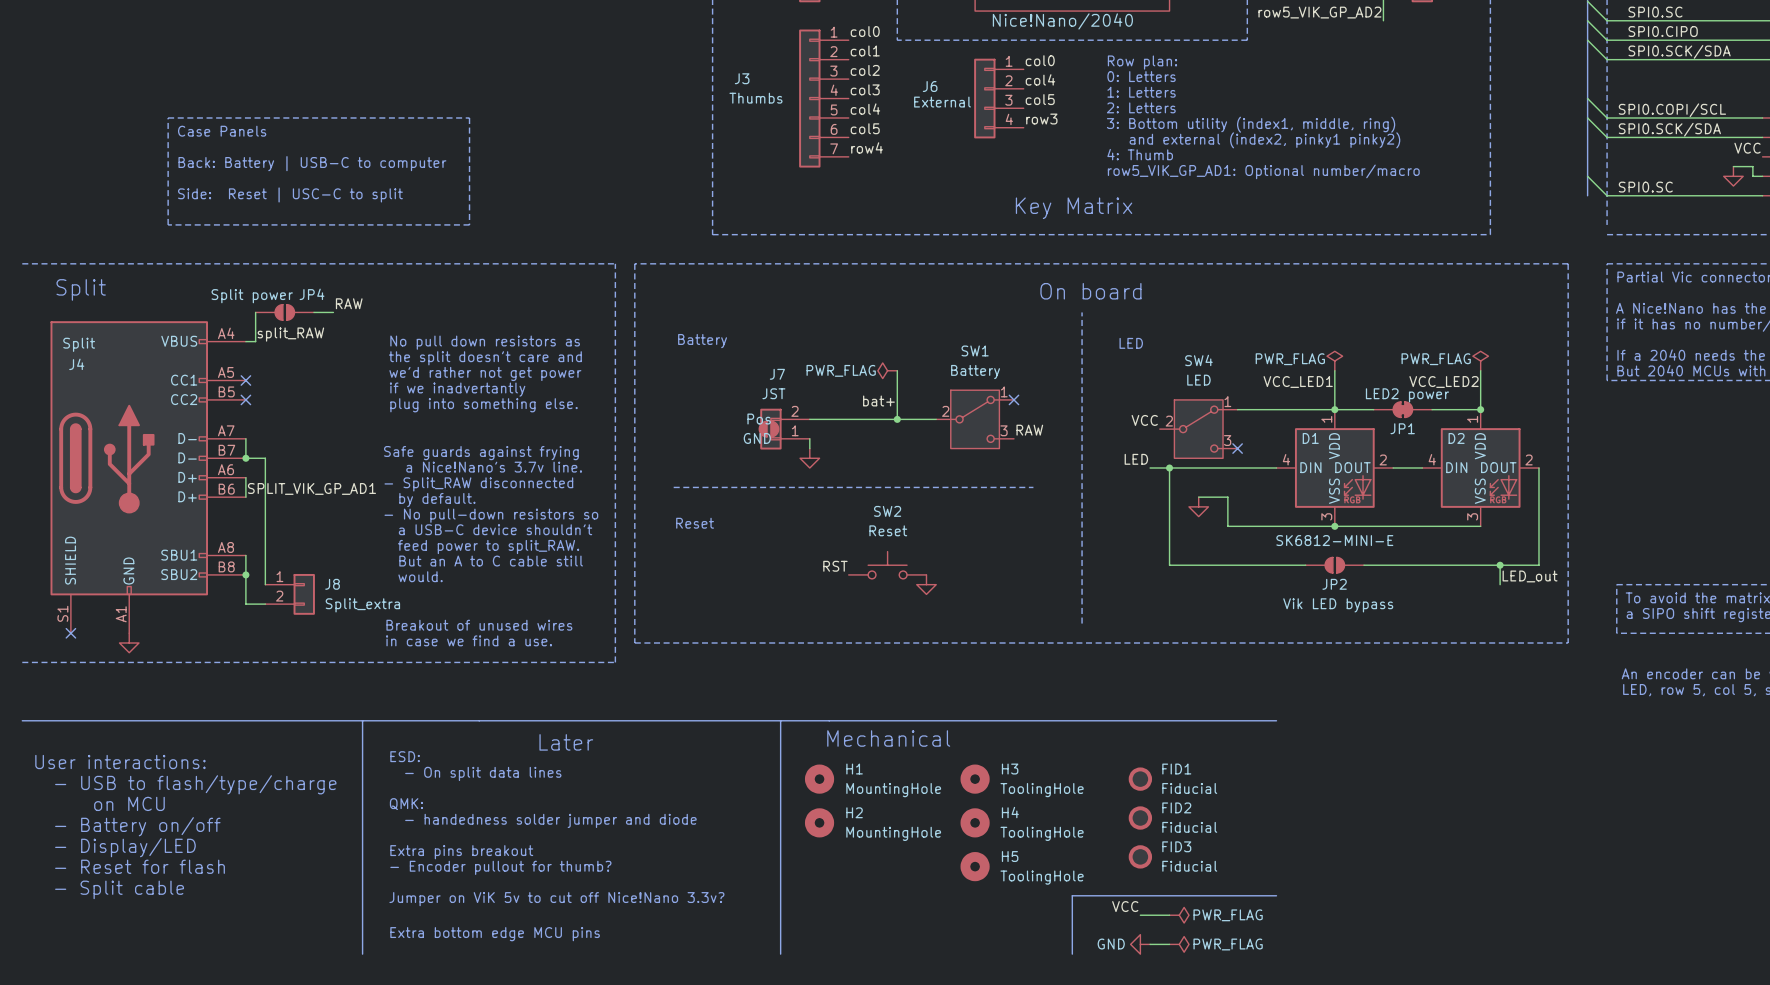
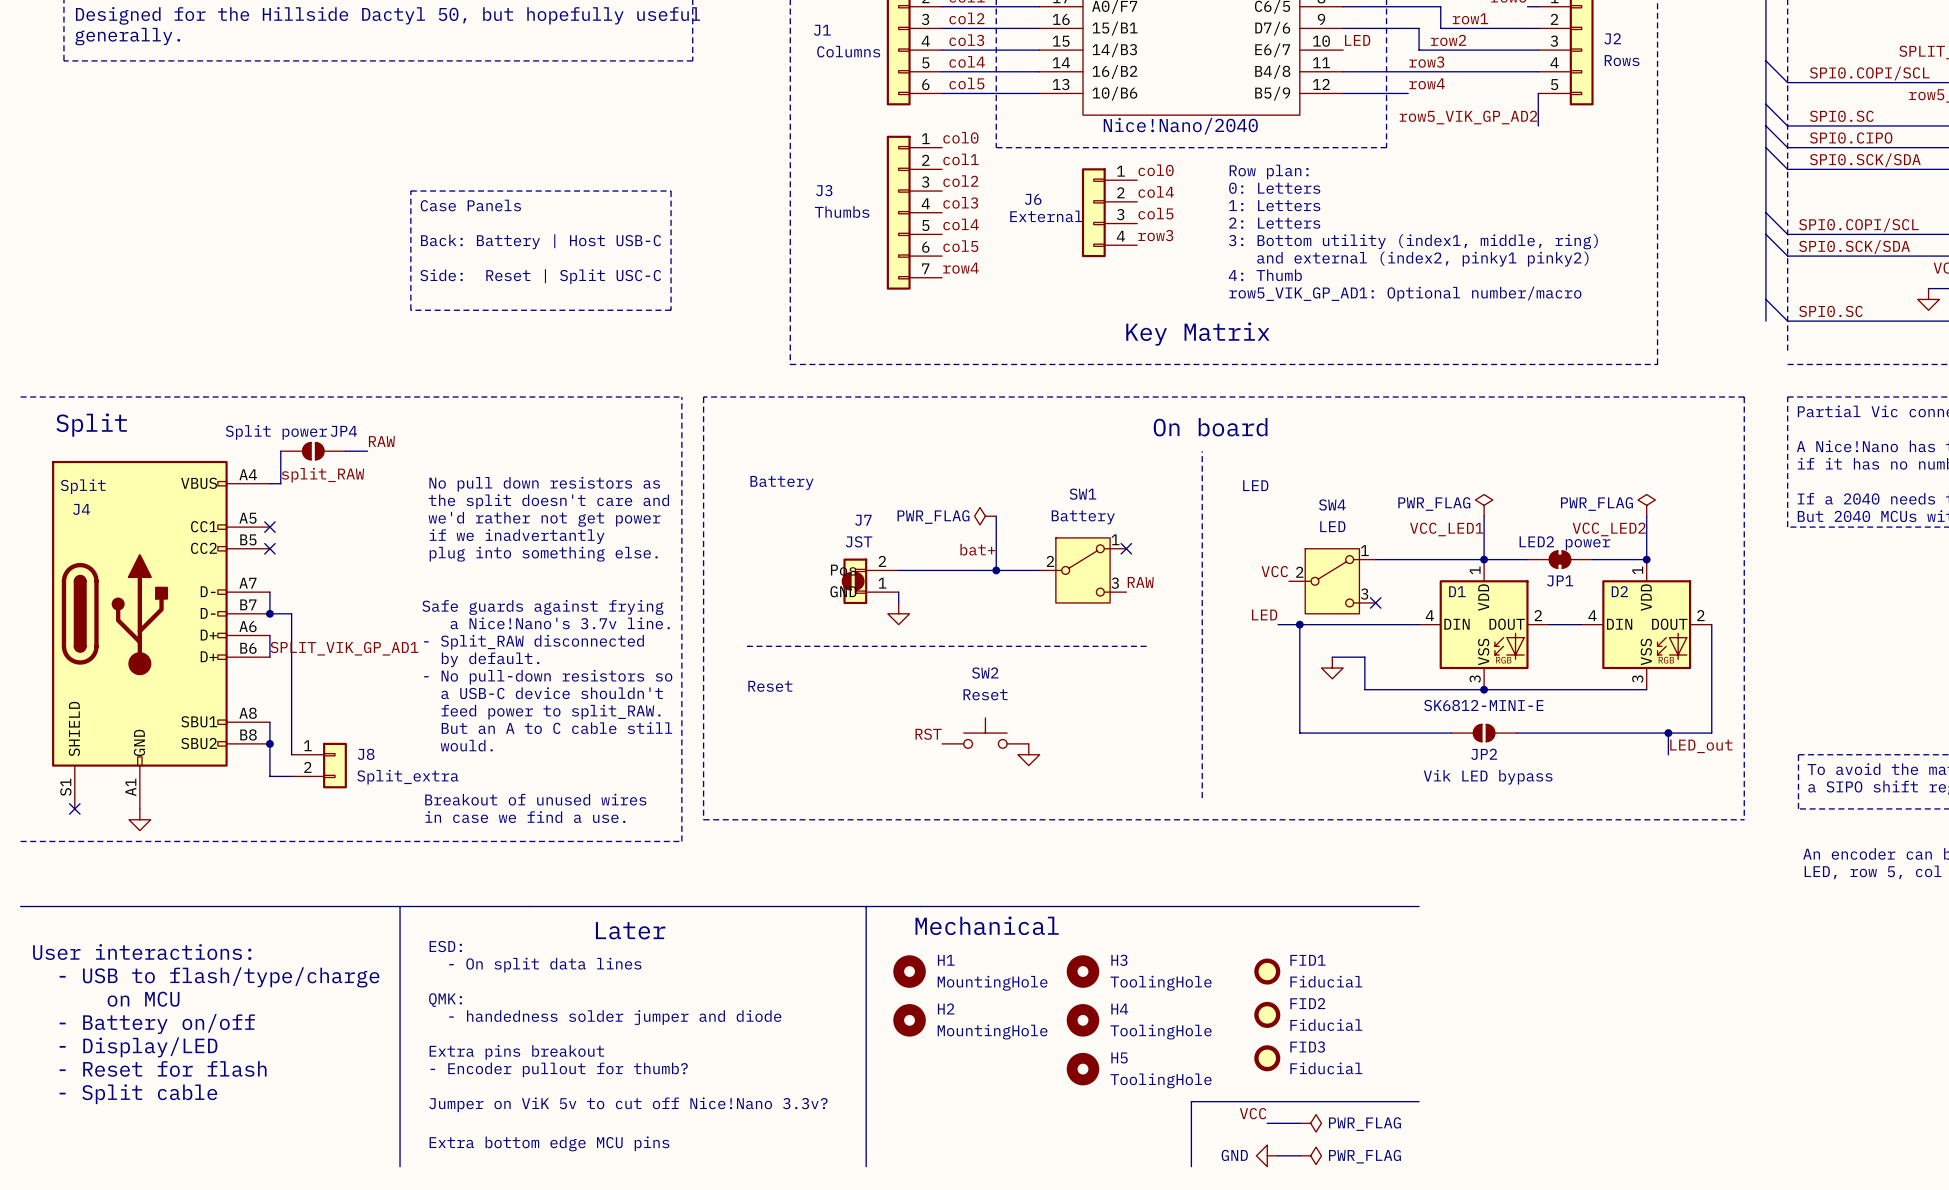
line: none -> (410, 191) (671, 191) (671, 310) (410, 310) (410, 191)
text: none -> Case Panels (470, 205)
line: (168, 117) (469, 117) (469, 224) (168, 224) (168, 117) -> none
text: none -> Back: Battery | Host USB-C (541, 241)
text: Case Panels (222, 131) -> none
text: none -> Side: Reset | Split USC-C (540, 276)
text: Back: Battery | USB-C to computer (312, 163) -> none
text: Side: Reset | USC-C to split (290, 194) -> none

